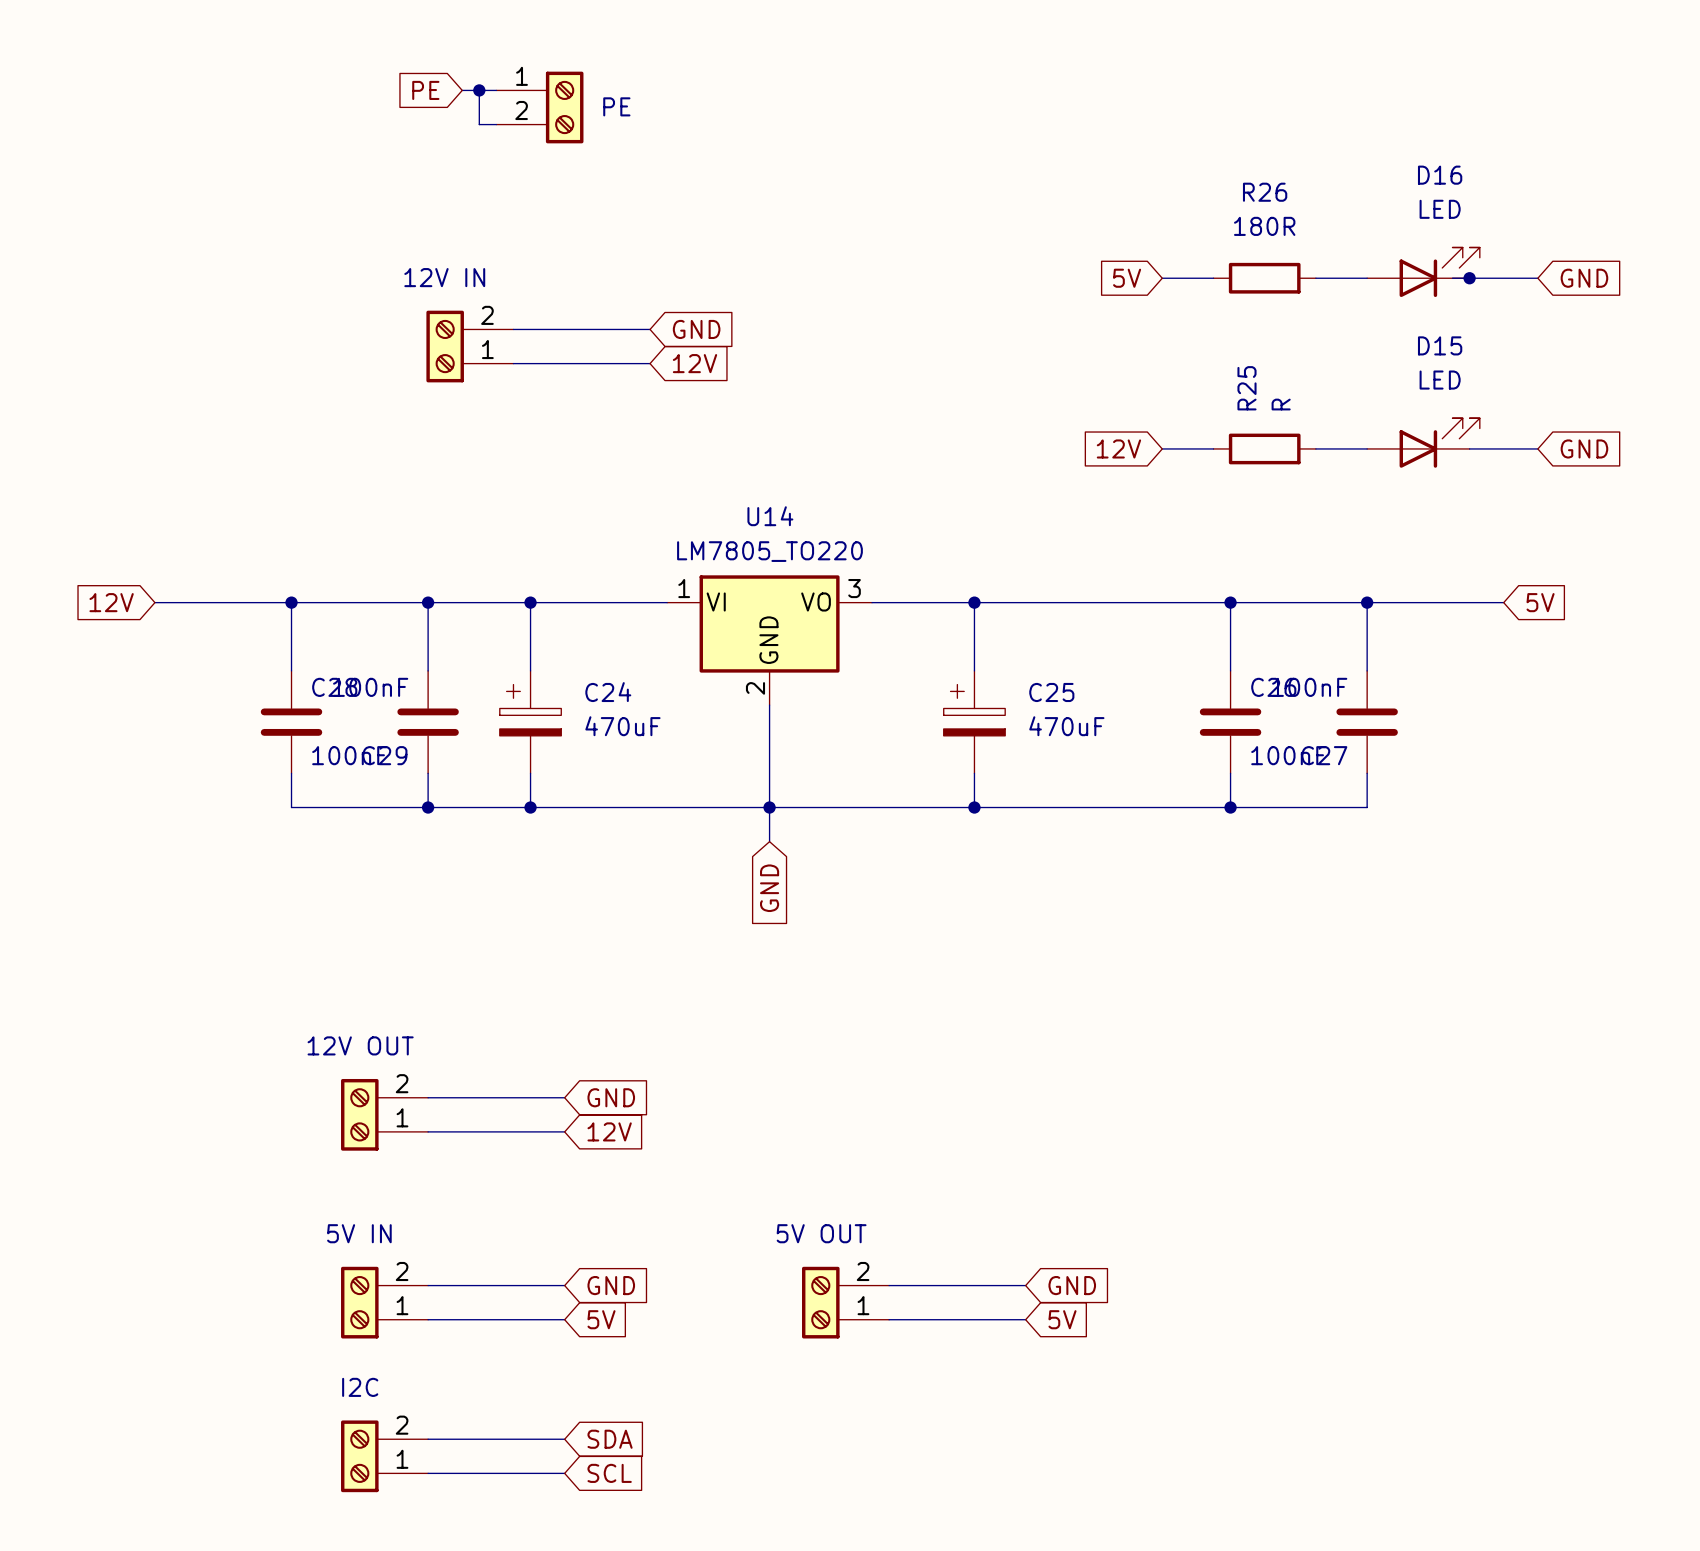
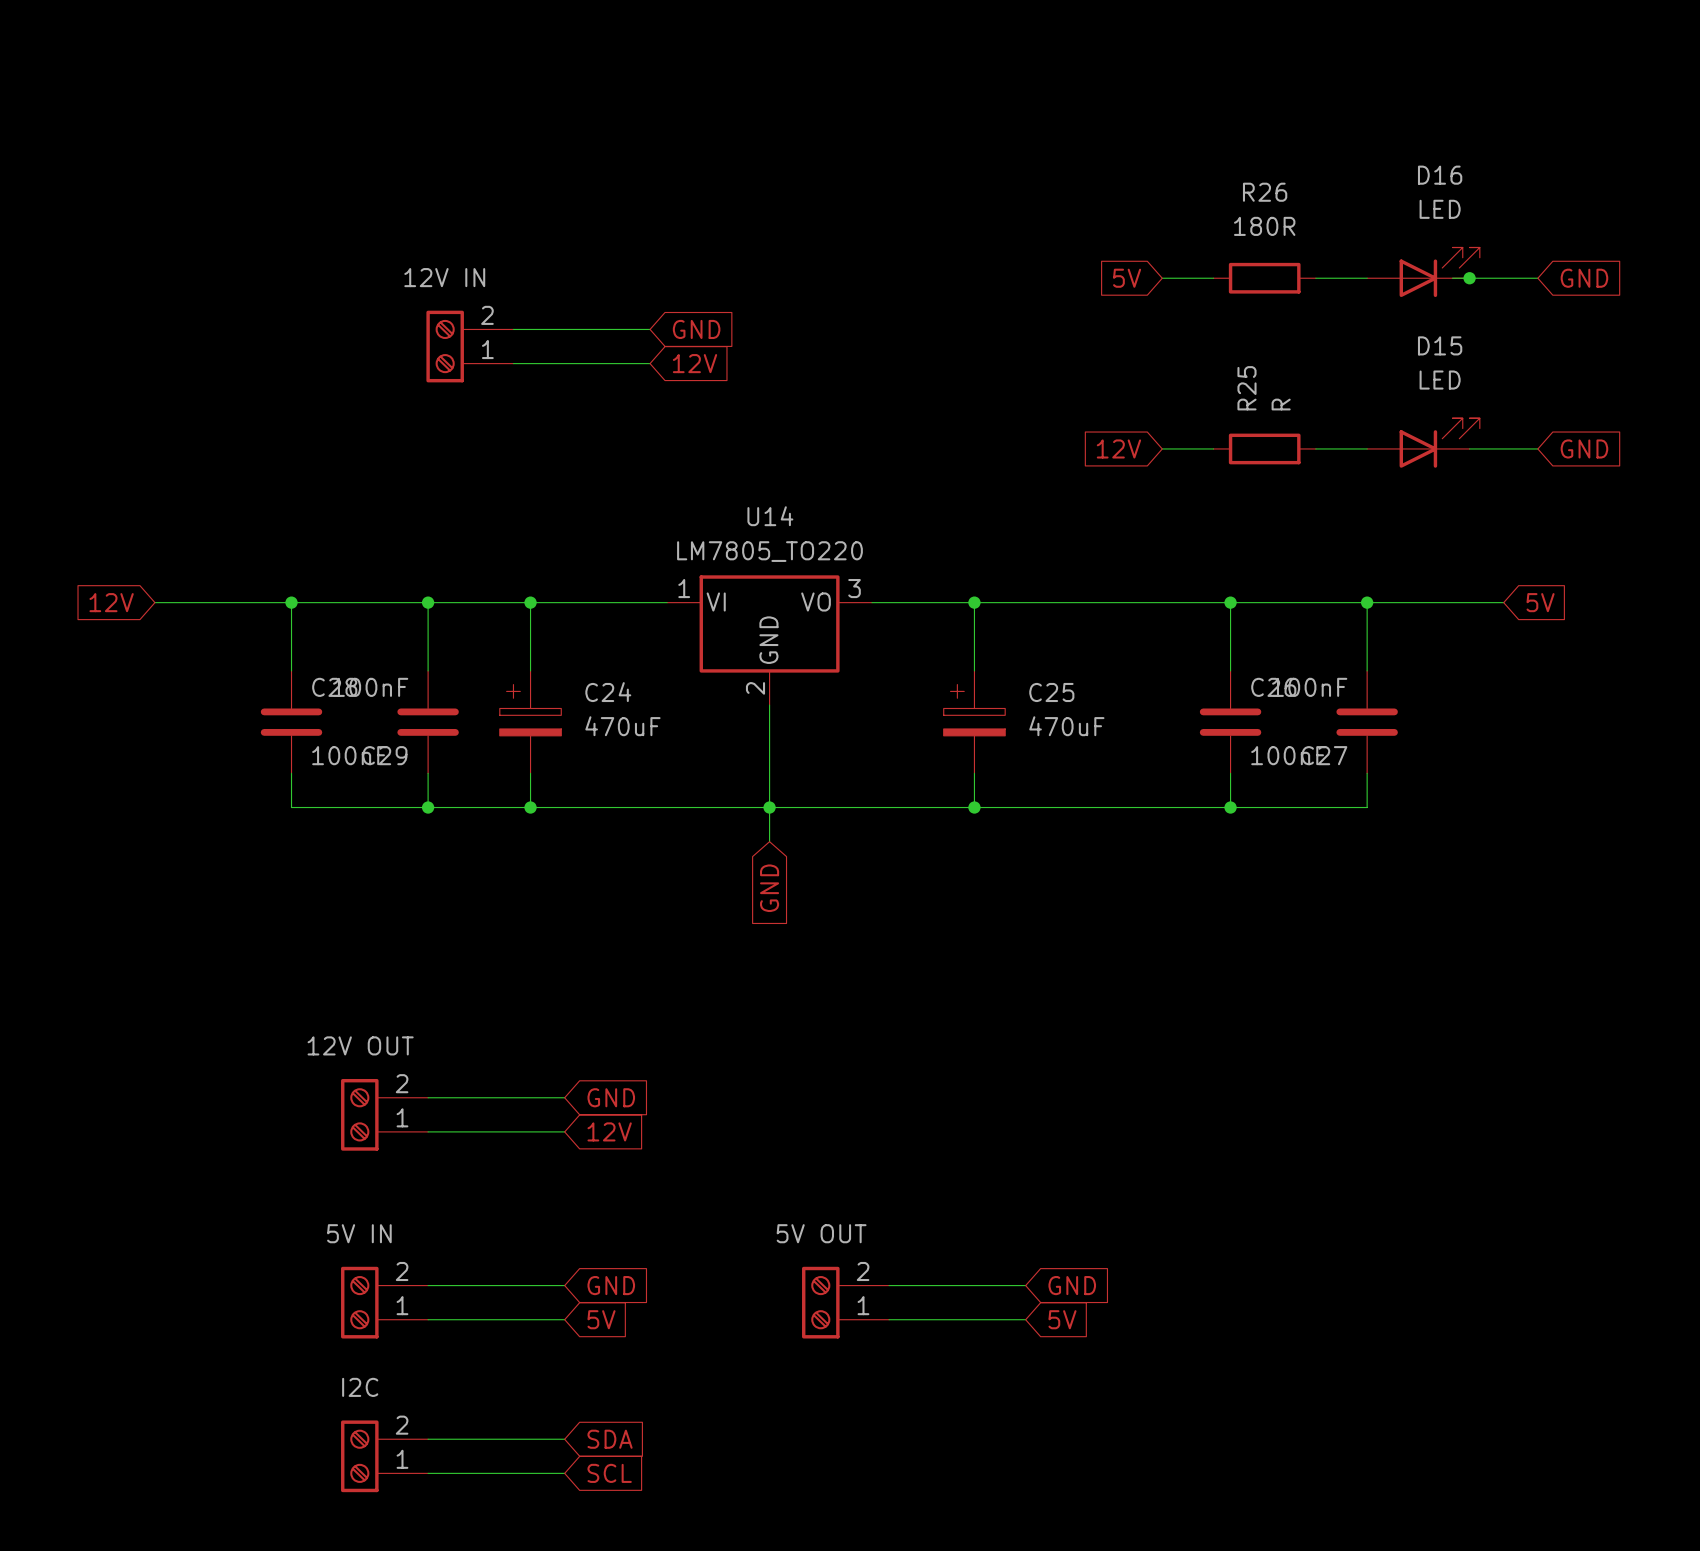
global label: PE (425, 90) -> none
wire: (462, 90) (496, 90) -> none
wire: (479, 90) (479, 124) (496, 124) -> none
junction: (479, 90) -> none
part: PE (539, 107) -> none

